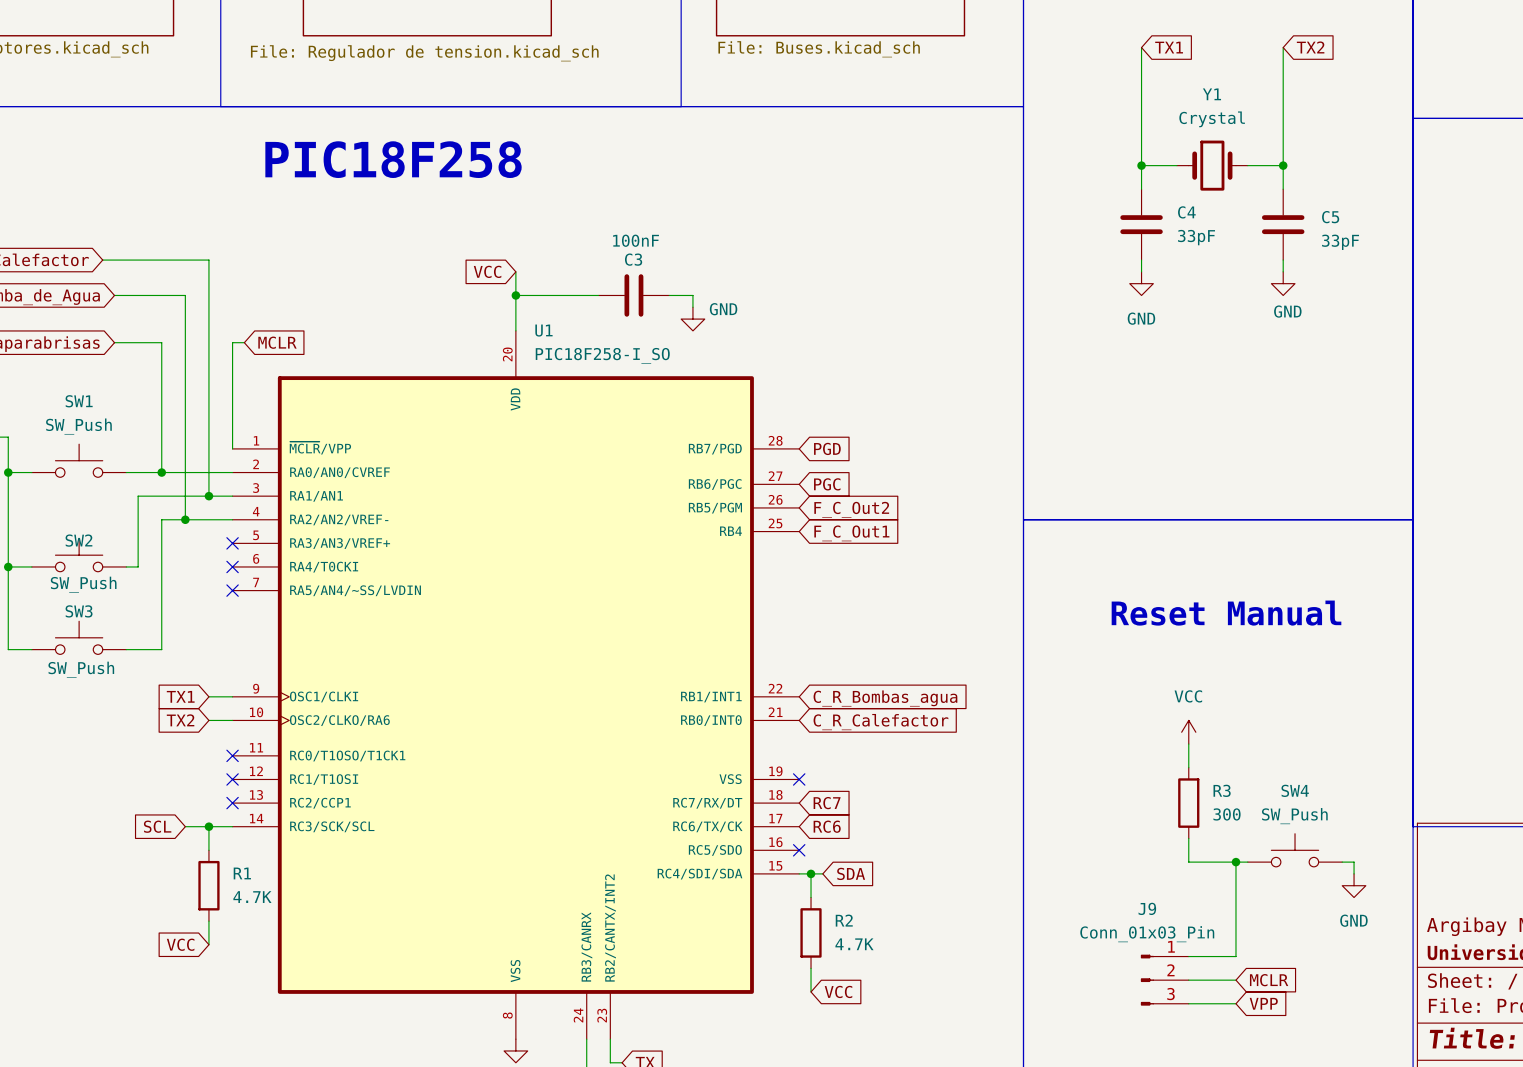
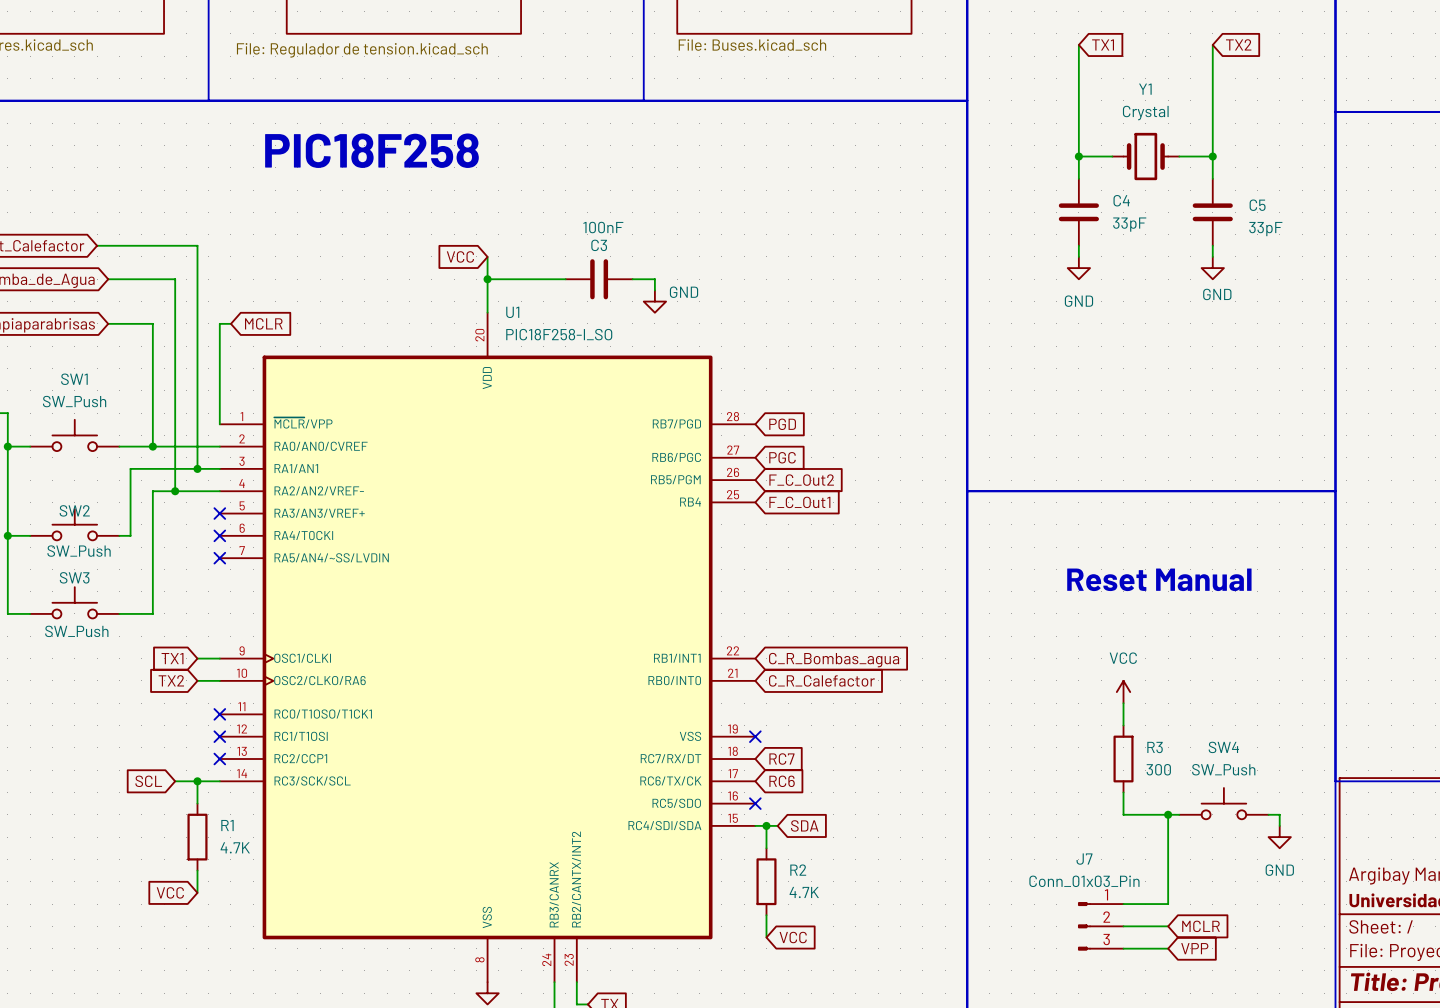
J9 name: J9 (1147, 908) -> J7 (1084, 859)

